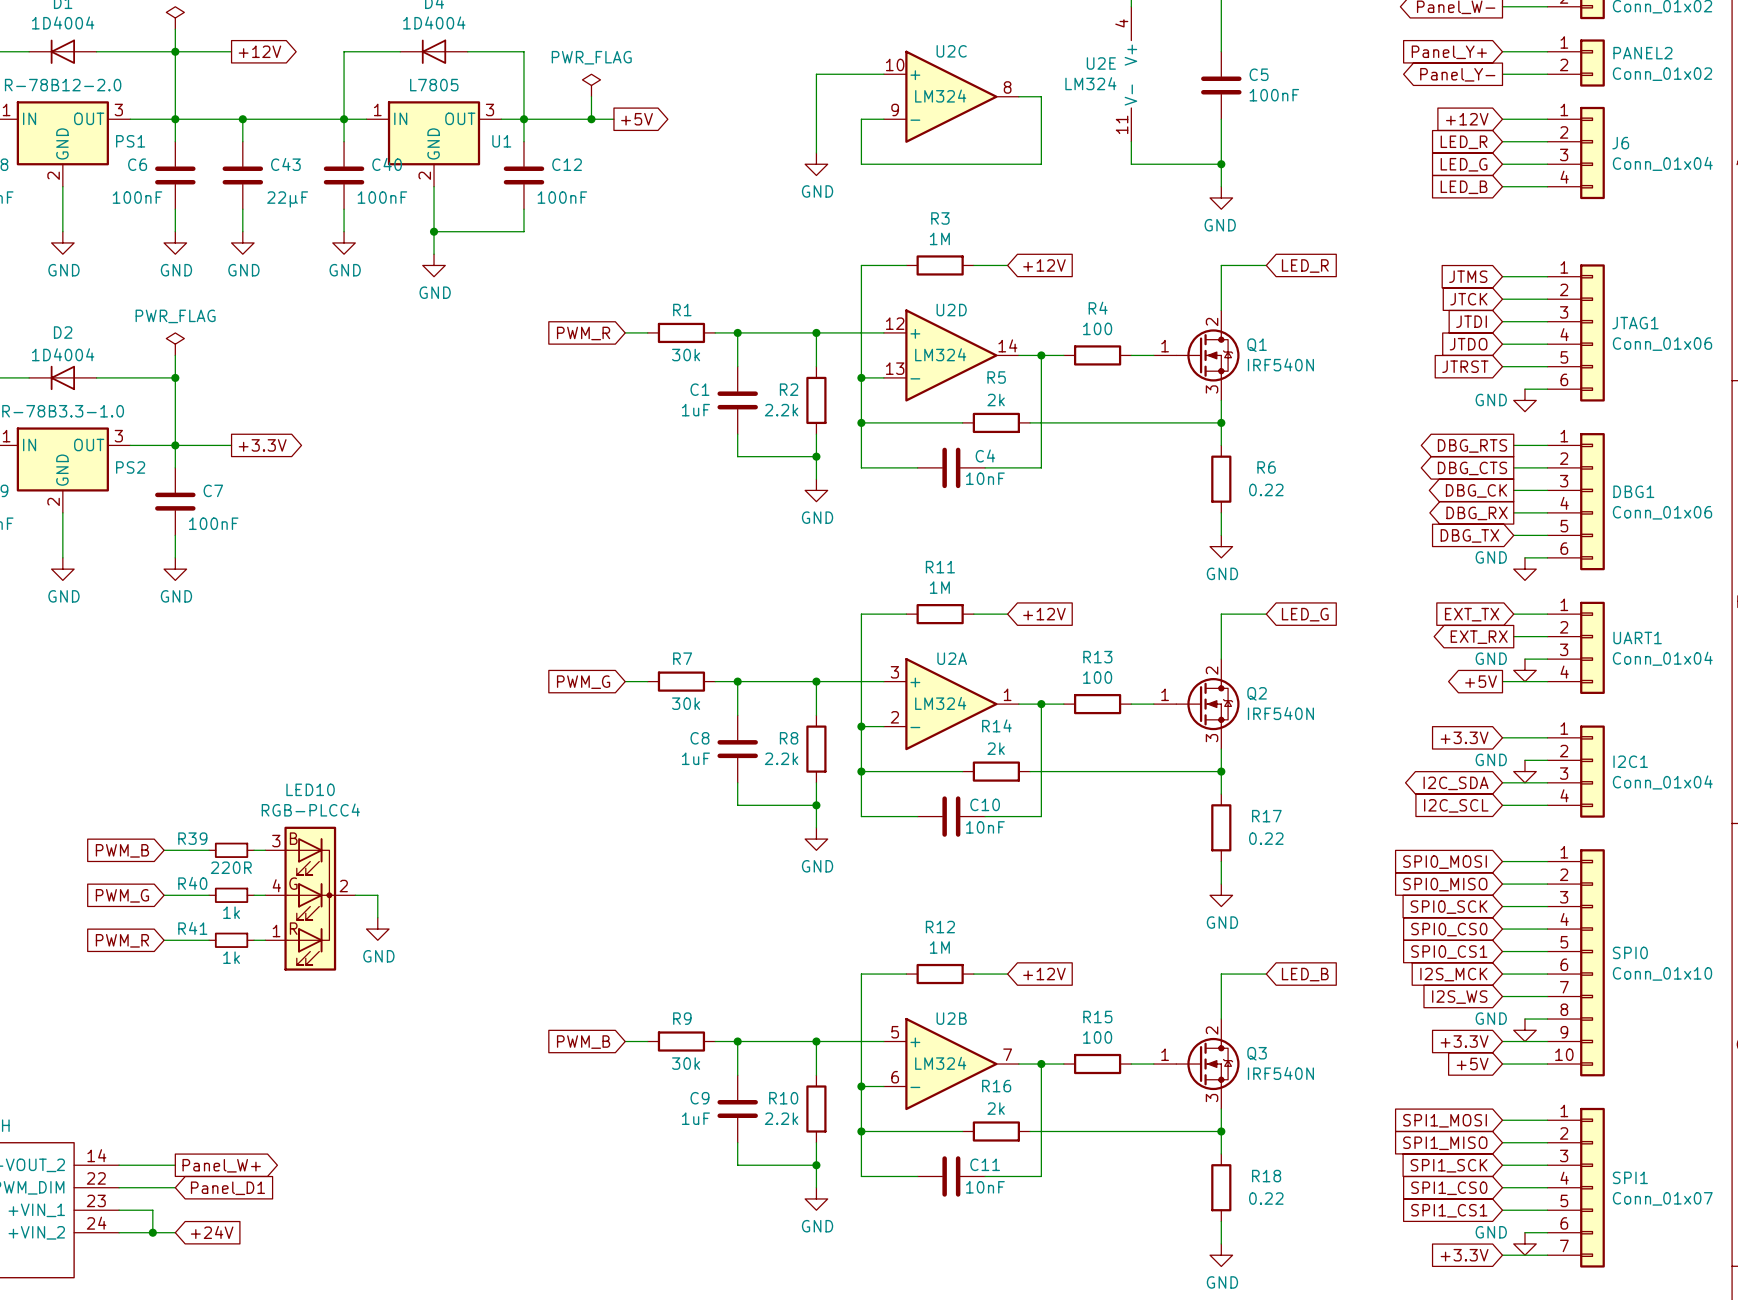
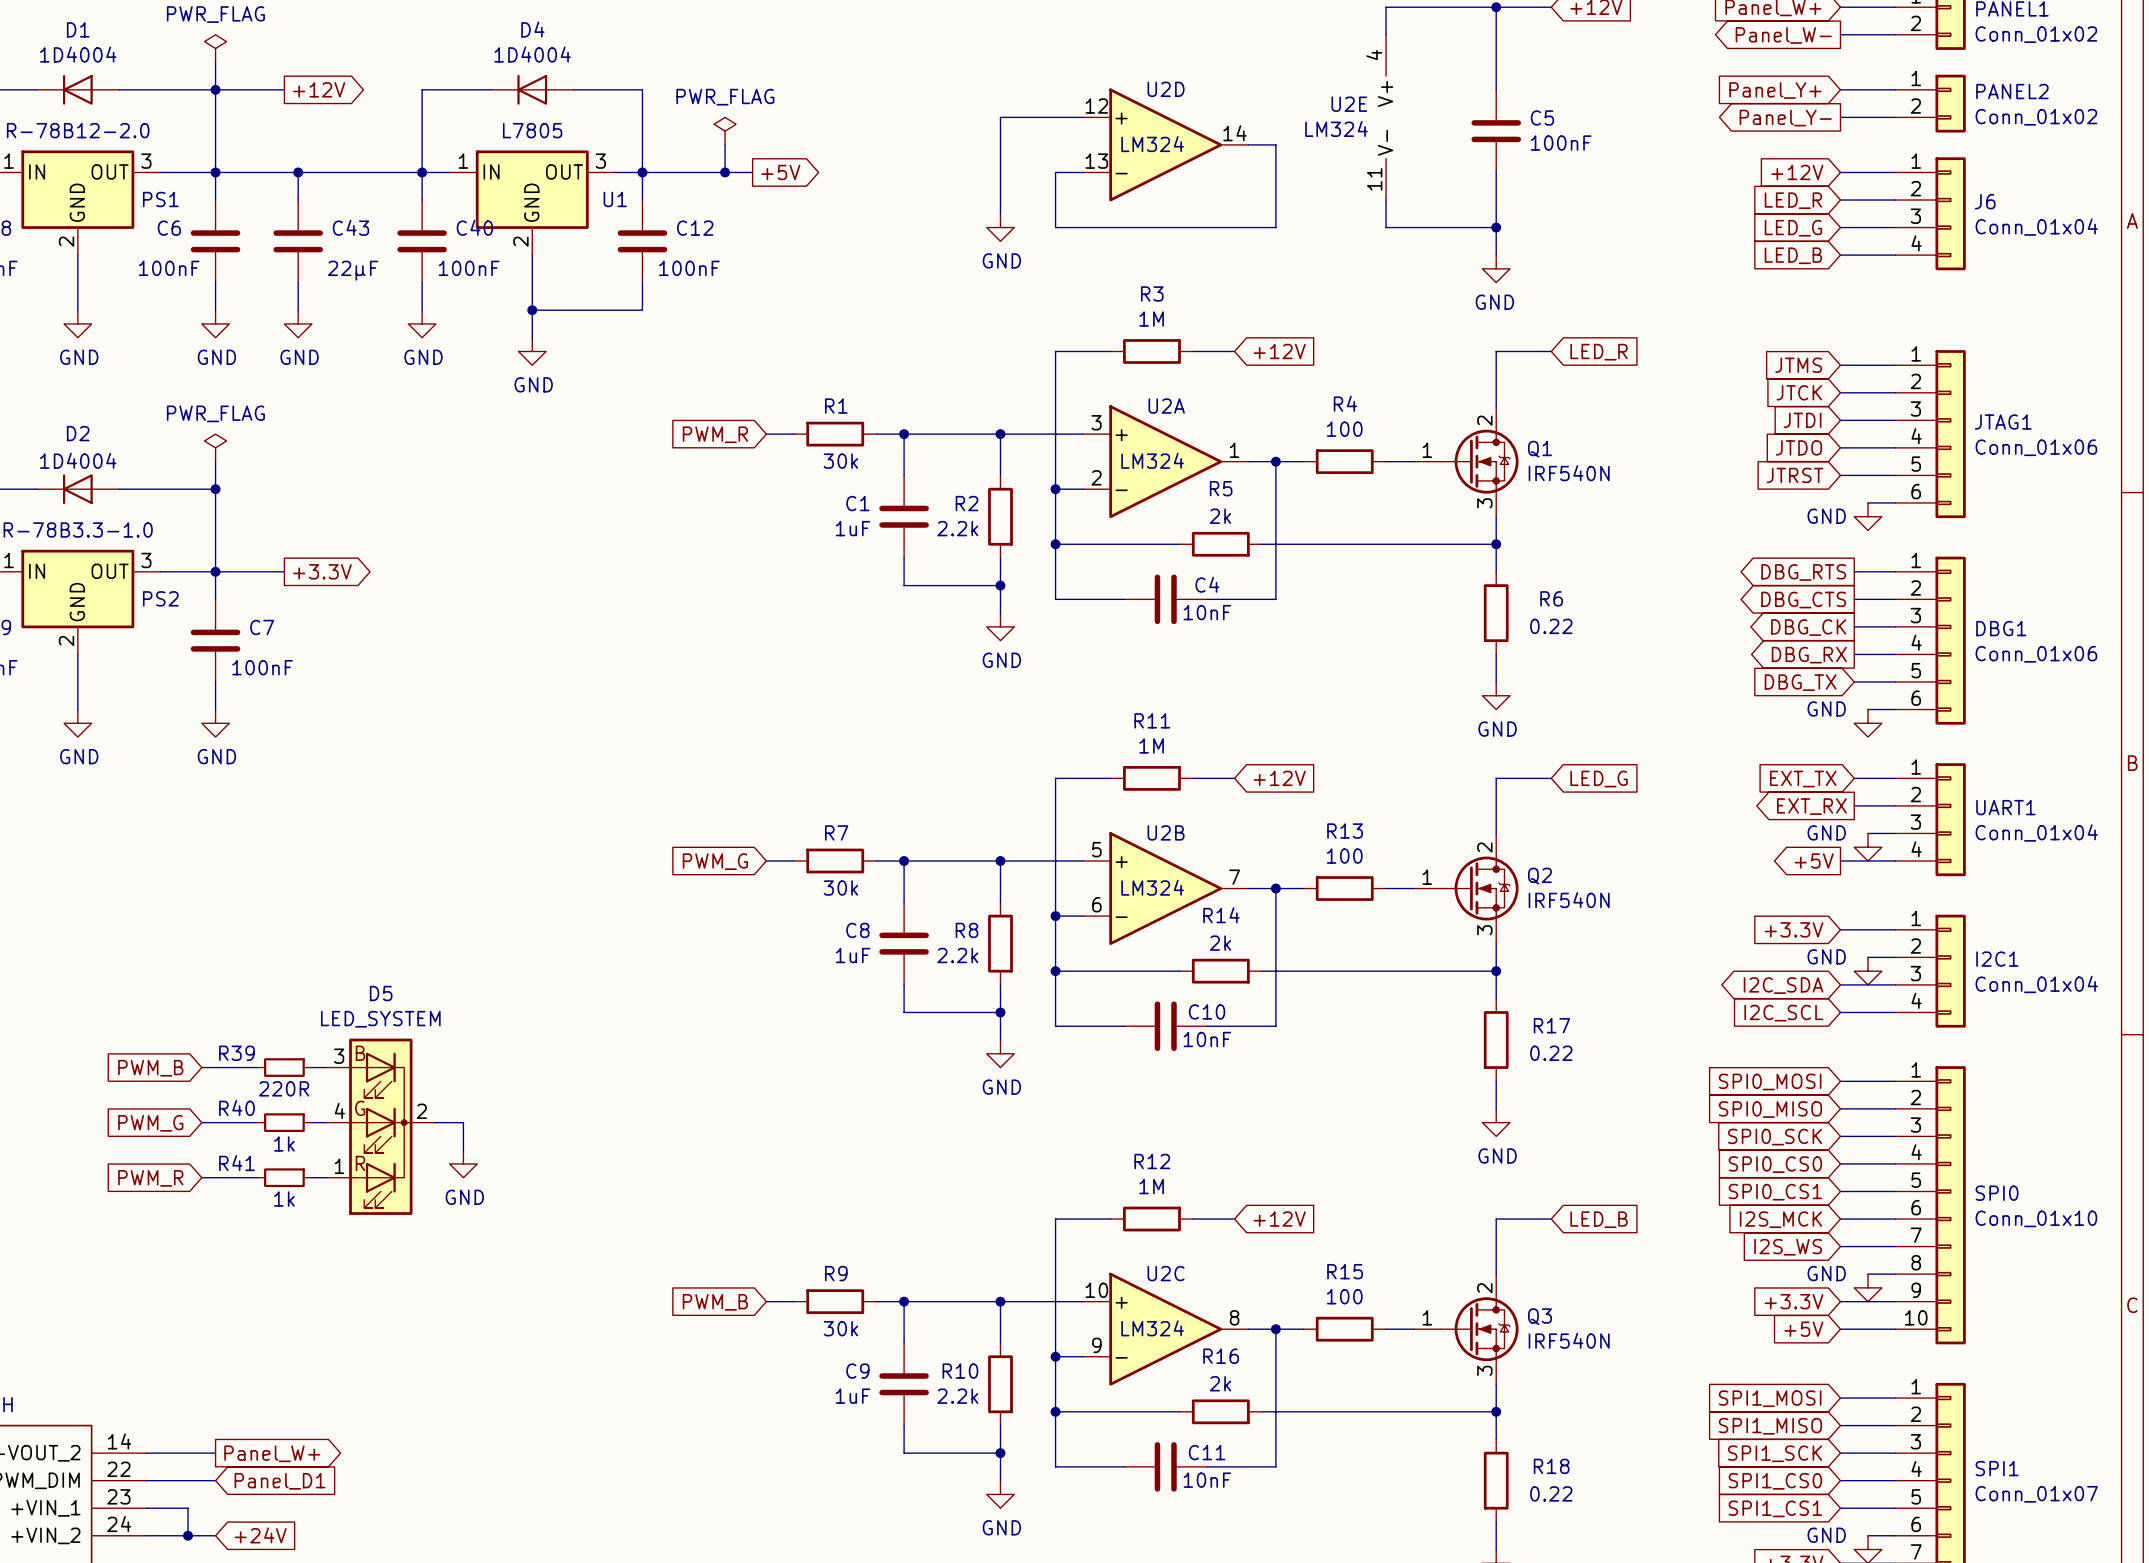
U2C position: (951, 96) -> (1165, 1329)
U2D position: (951, 355) -> (1165, 144)
U2A position: (951, 704) -> (1165, 461)
LED10 name: LED10 (310, 789) -> D5 (381, 993)
LED10 value: RGB-PLCC4 (310, 810) -> LED_SYSTEM (380, 1019)
U2B position: (951, 1064) -> (1165, 888)

